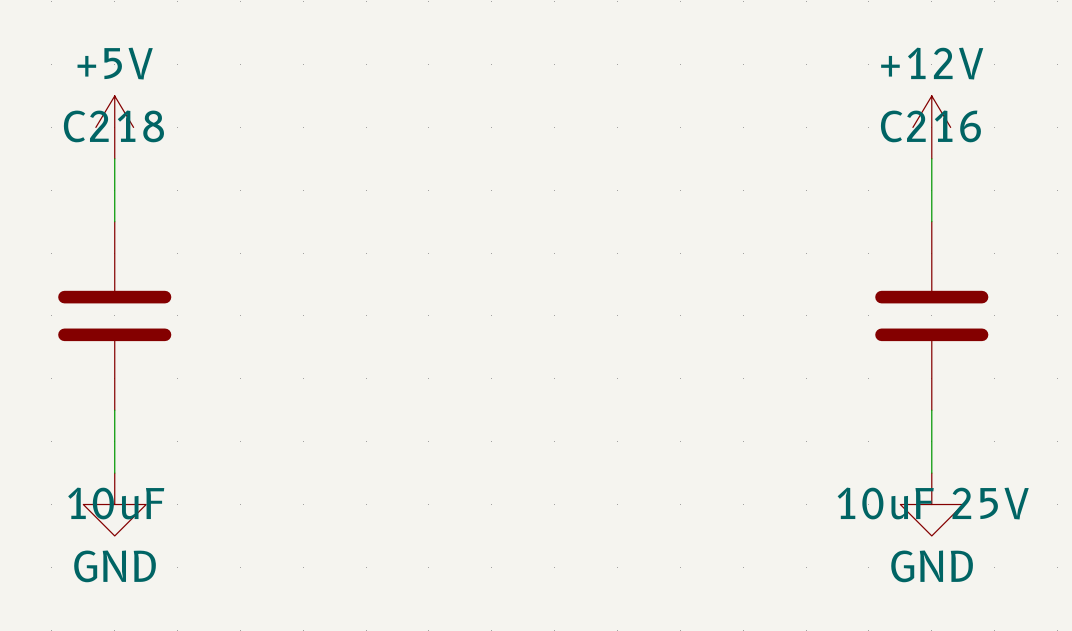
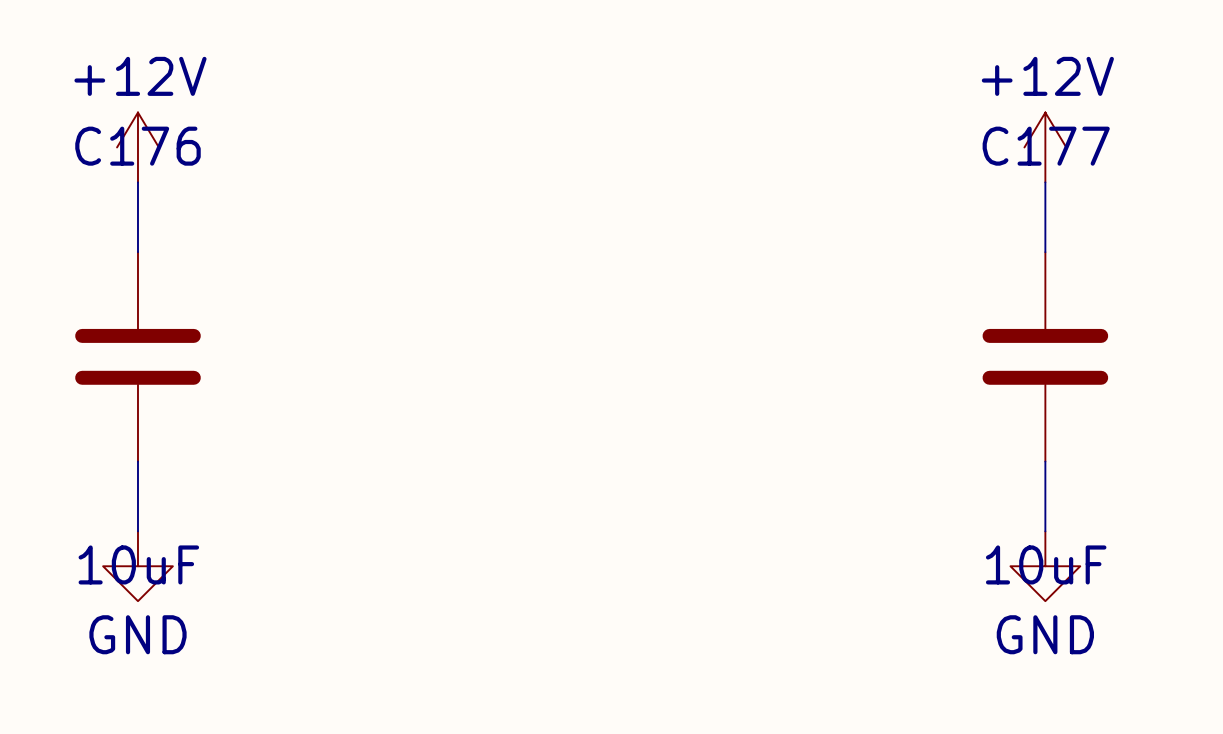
C218 name: C218 (113, 126) -> C176 (137, 146)
C216 name: C216 (930, 126) -> C177 (1046, 146)
power symbol: +5V (114, 127) -> +12V (137, 147)
C216 value: 10uF 25V (933, 503) -> 10uF (1046, 564)

